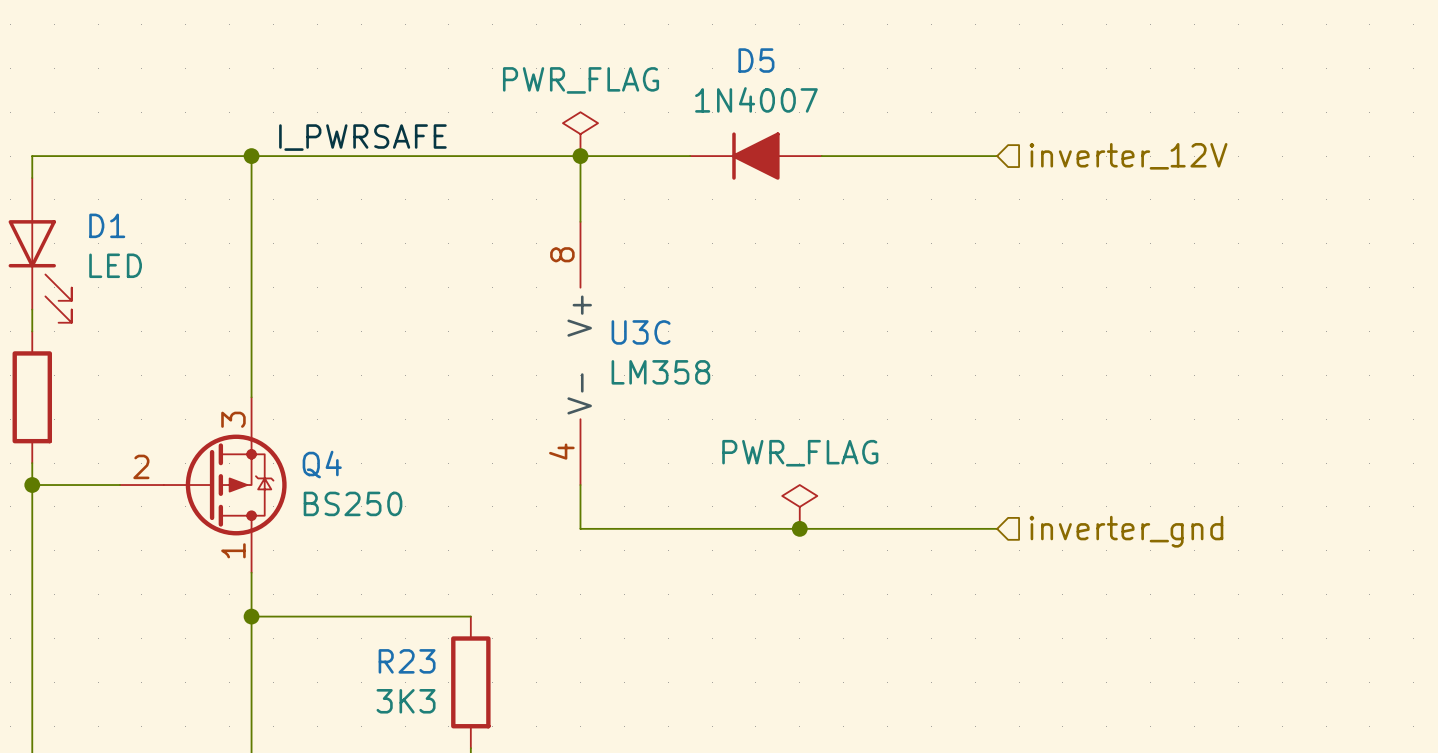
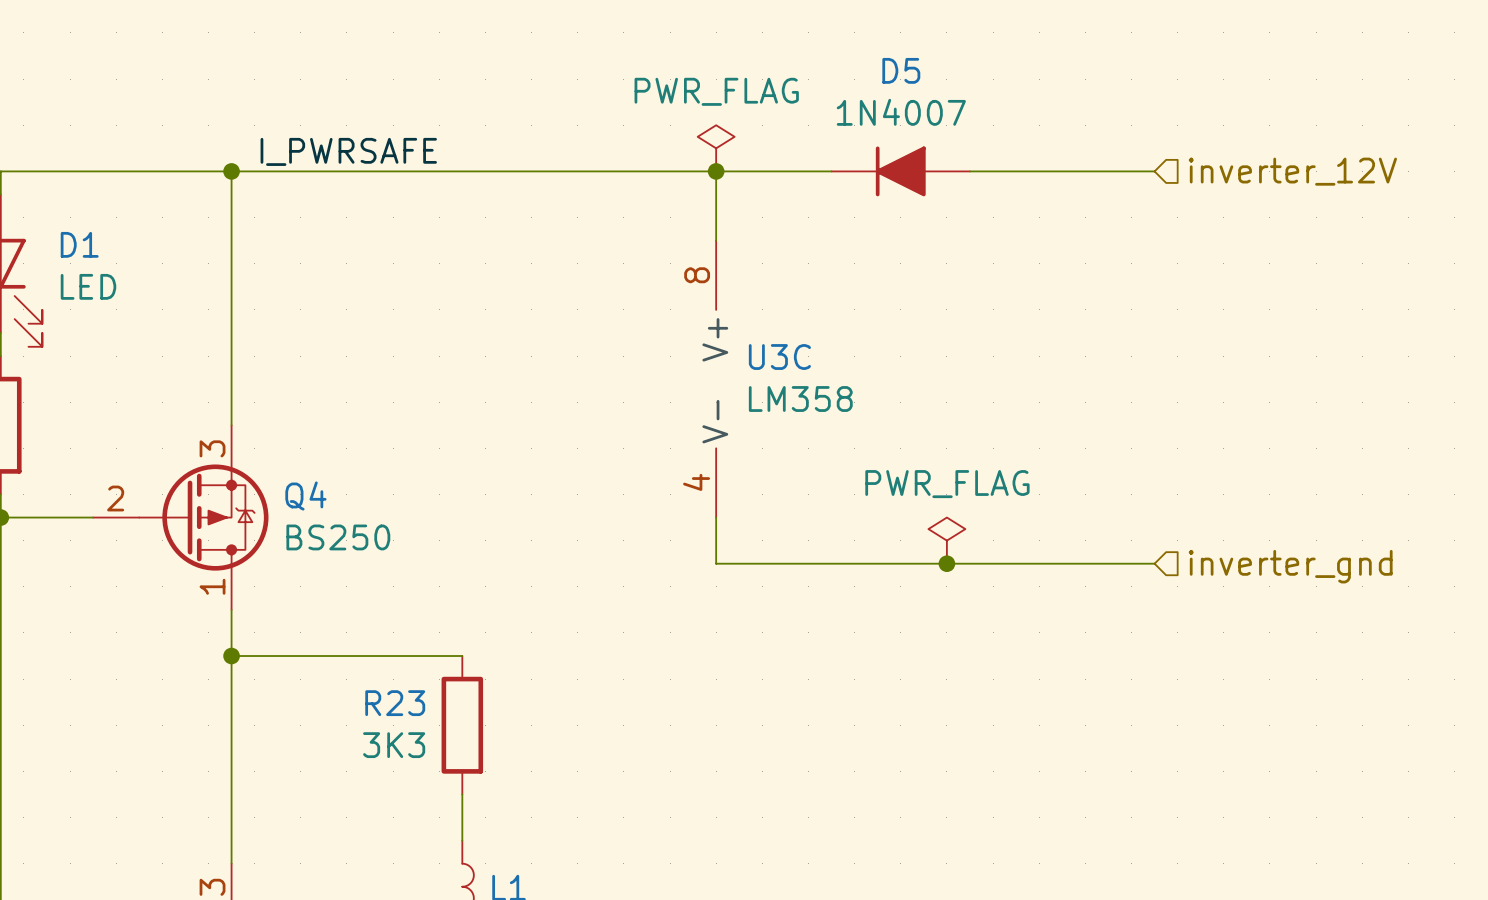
power symbol position: PWR_FLAG (580, 134) -> PWR_FLAG (716, 148)
wire: (580, 156) (580, 221) -> (716, 171) (716, 240)
junction: (580, 156) -> none
junction: none -> (716, 171)
D5 position: (755, 156) -> (900, 171)
wire: none -> (1016, 171) (1154, 171)
hierarchical label position: inverter_12V (1128, 156) -> inverter_12V (1292, 171)
U3C position: (580, 353) -> (716, 379)
wire: (580, 485) (580, 528) (712, 528) -> (716, 517) (716, 563)
power symbol position: PWR_FLAG (799, 506) -> PWR_FLAG (946, 540)
junction: (799, 528) -> none
junction: none -> (946, 563)
wire: none -> (1016, 563) (1154, 563)
hierarchical label position: inverter_gnd (1126, 531) -> inverter_gnd (1290, 566)

